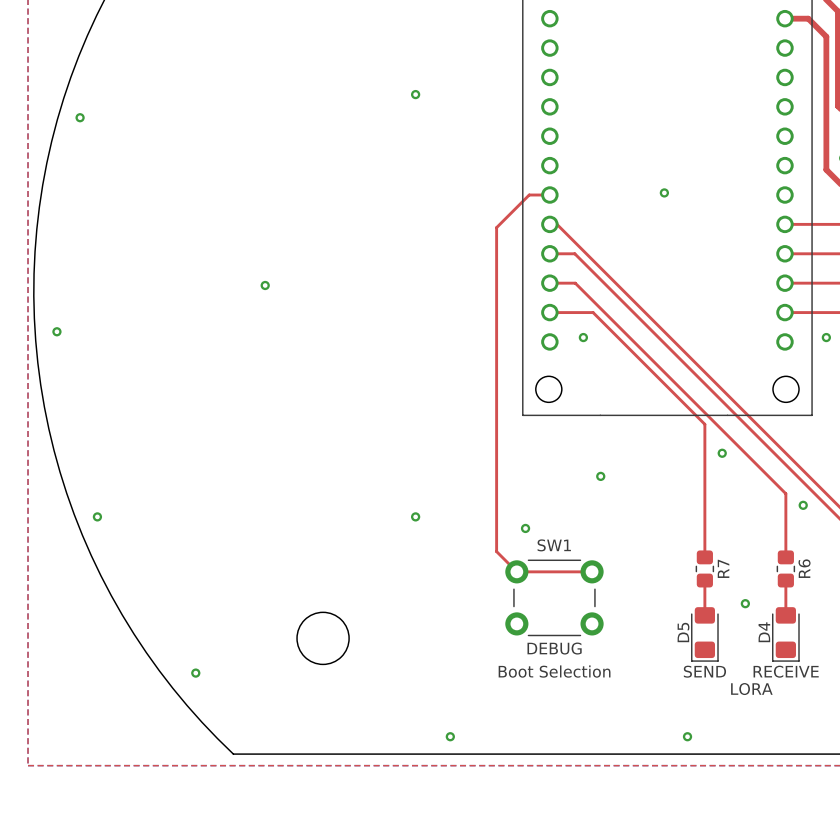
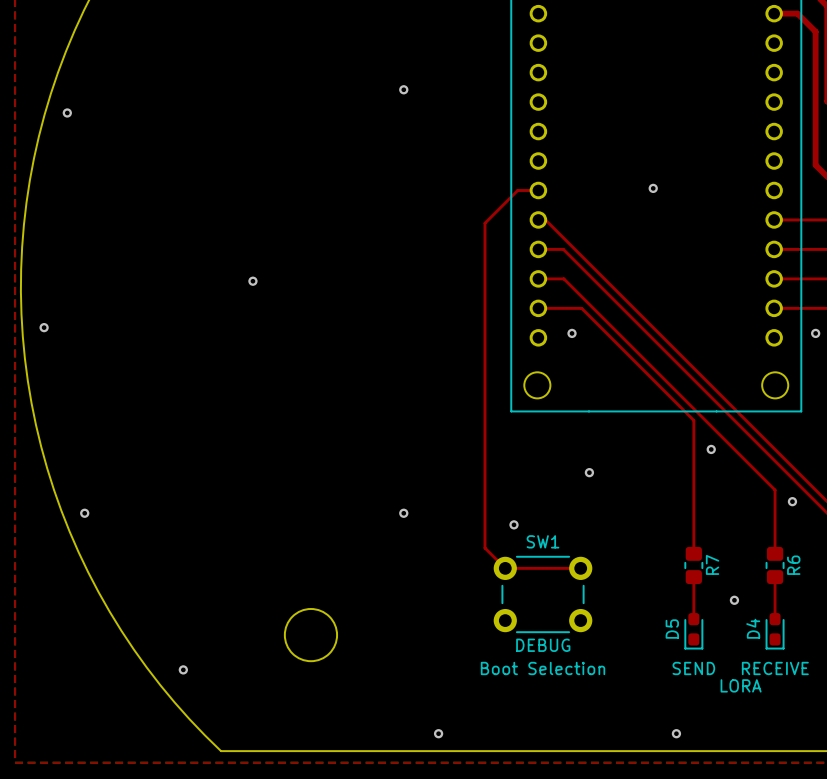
D5 footprint: [691, 607, 719, 662] -> [684, 613, 704, 650]
D4 footprint: [772, 607, 800, 662] -> [765, 613, 785, 650]

